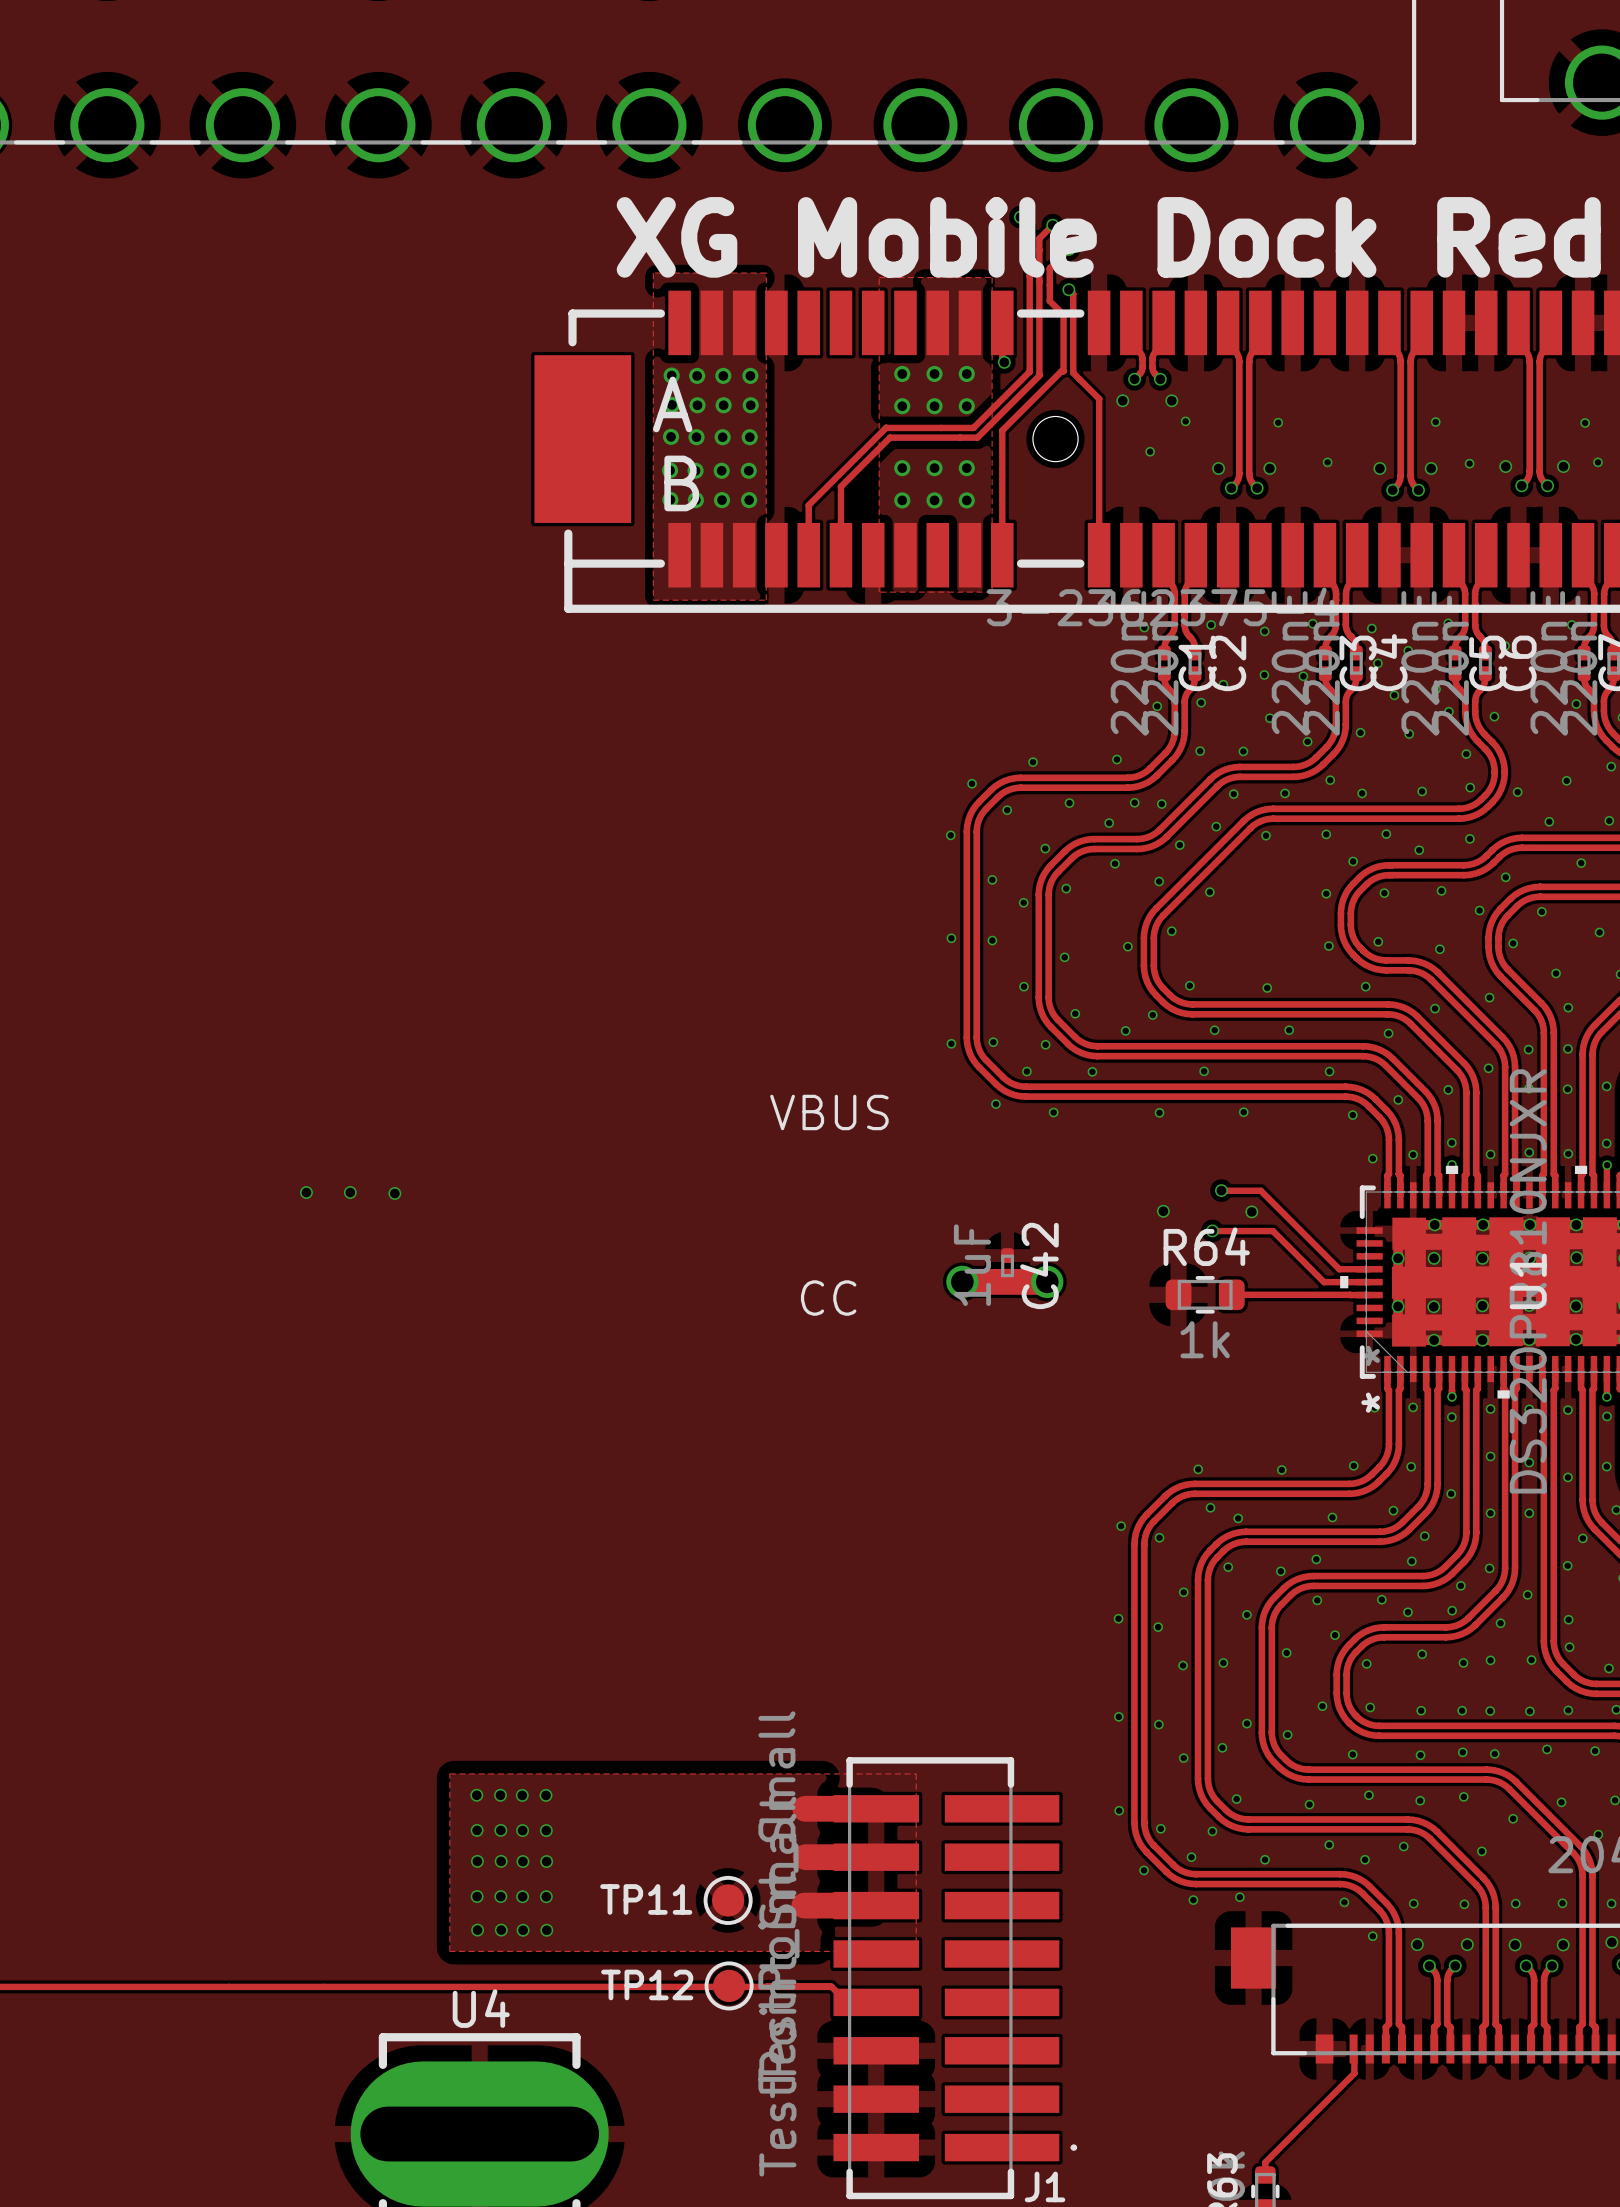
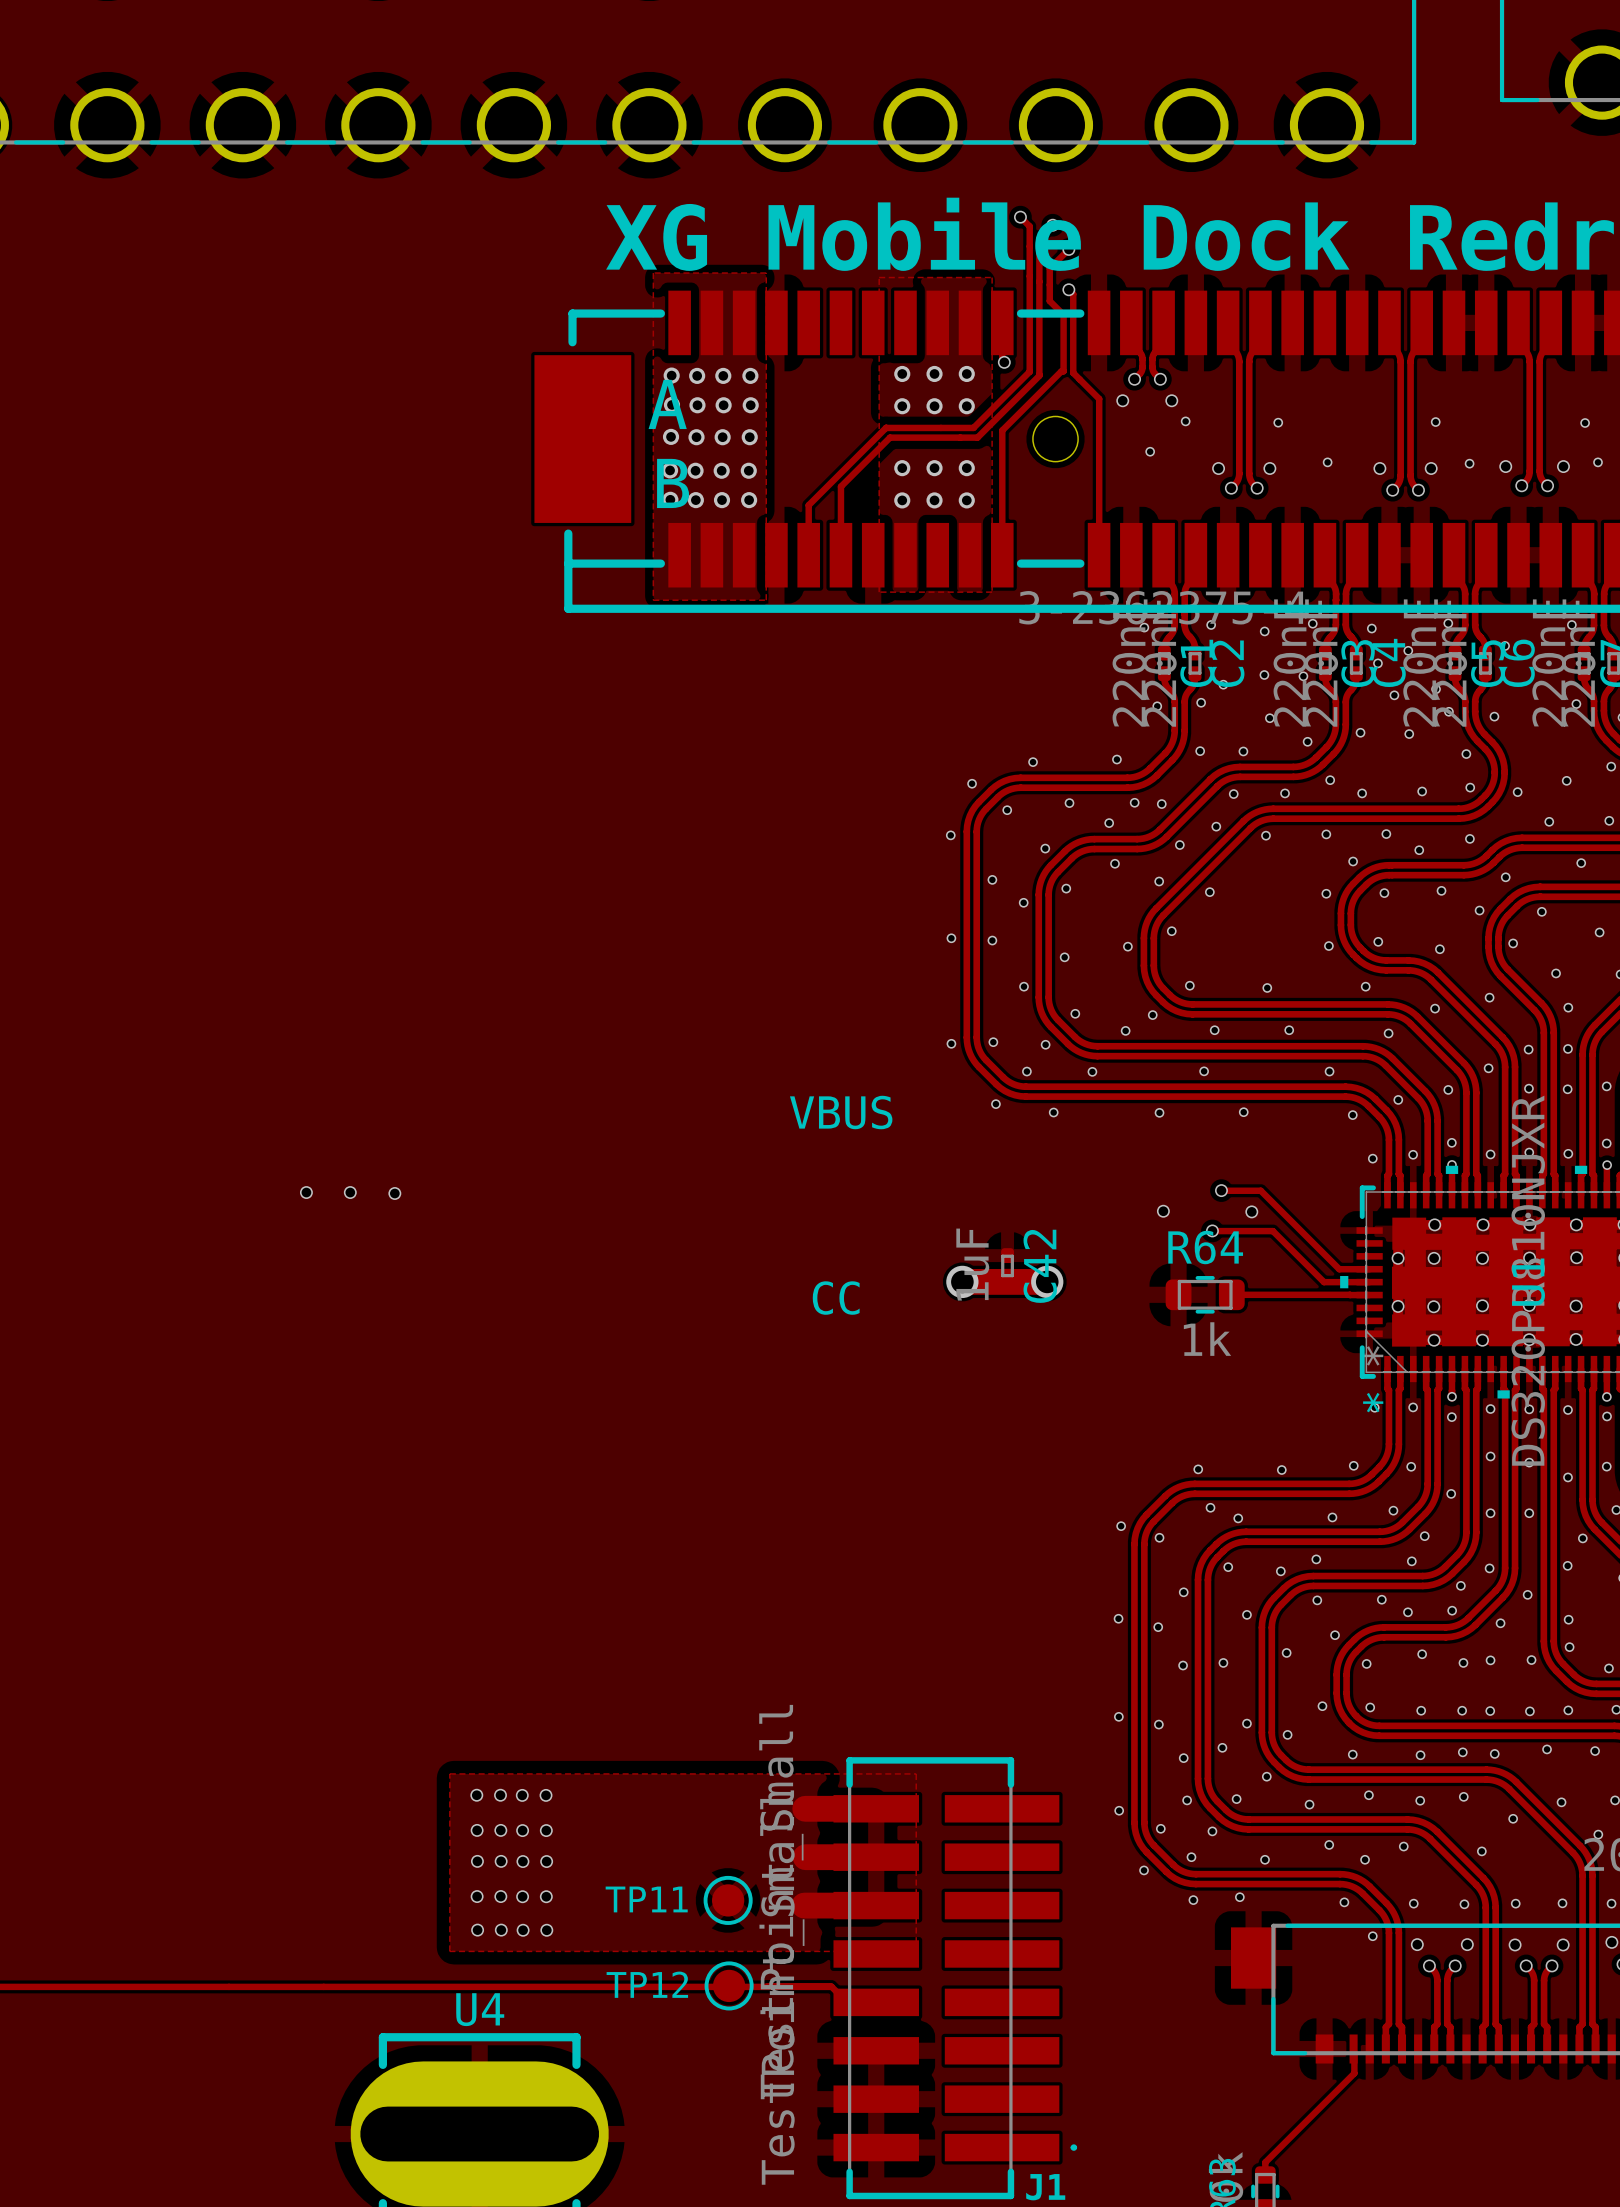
via: none -> (1266, 1776)
via: none -> (1187, 1800)

